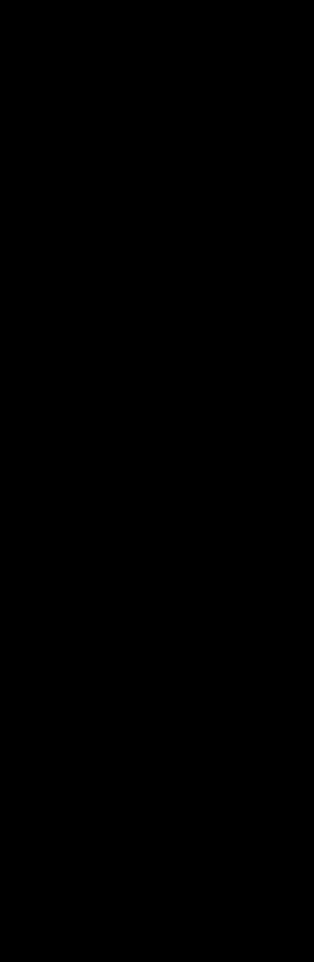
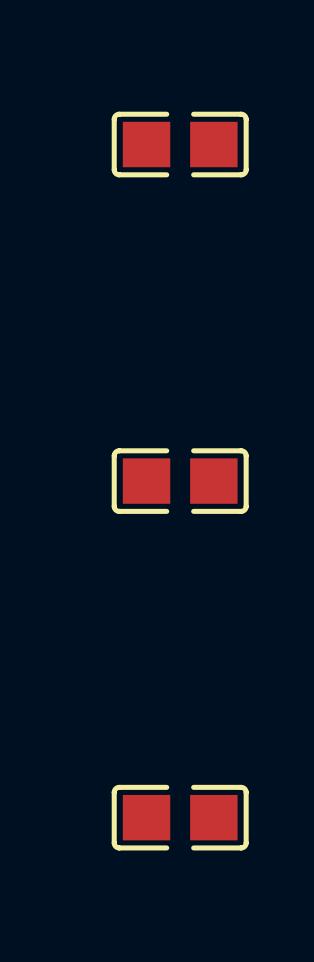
part: none -> (180, 144)
part: none -> (180, 481)
part: none -> (180, 817)

